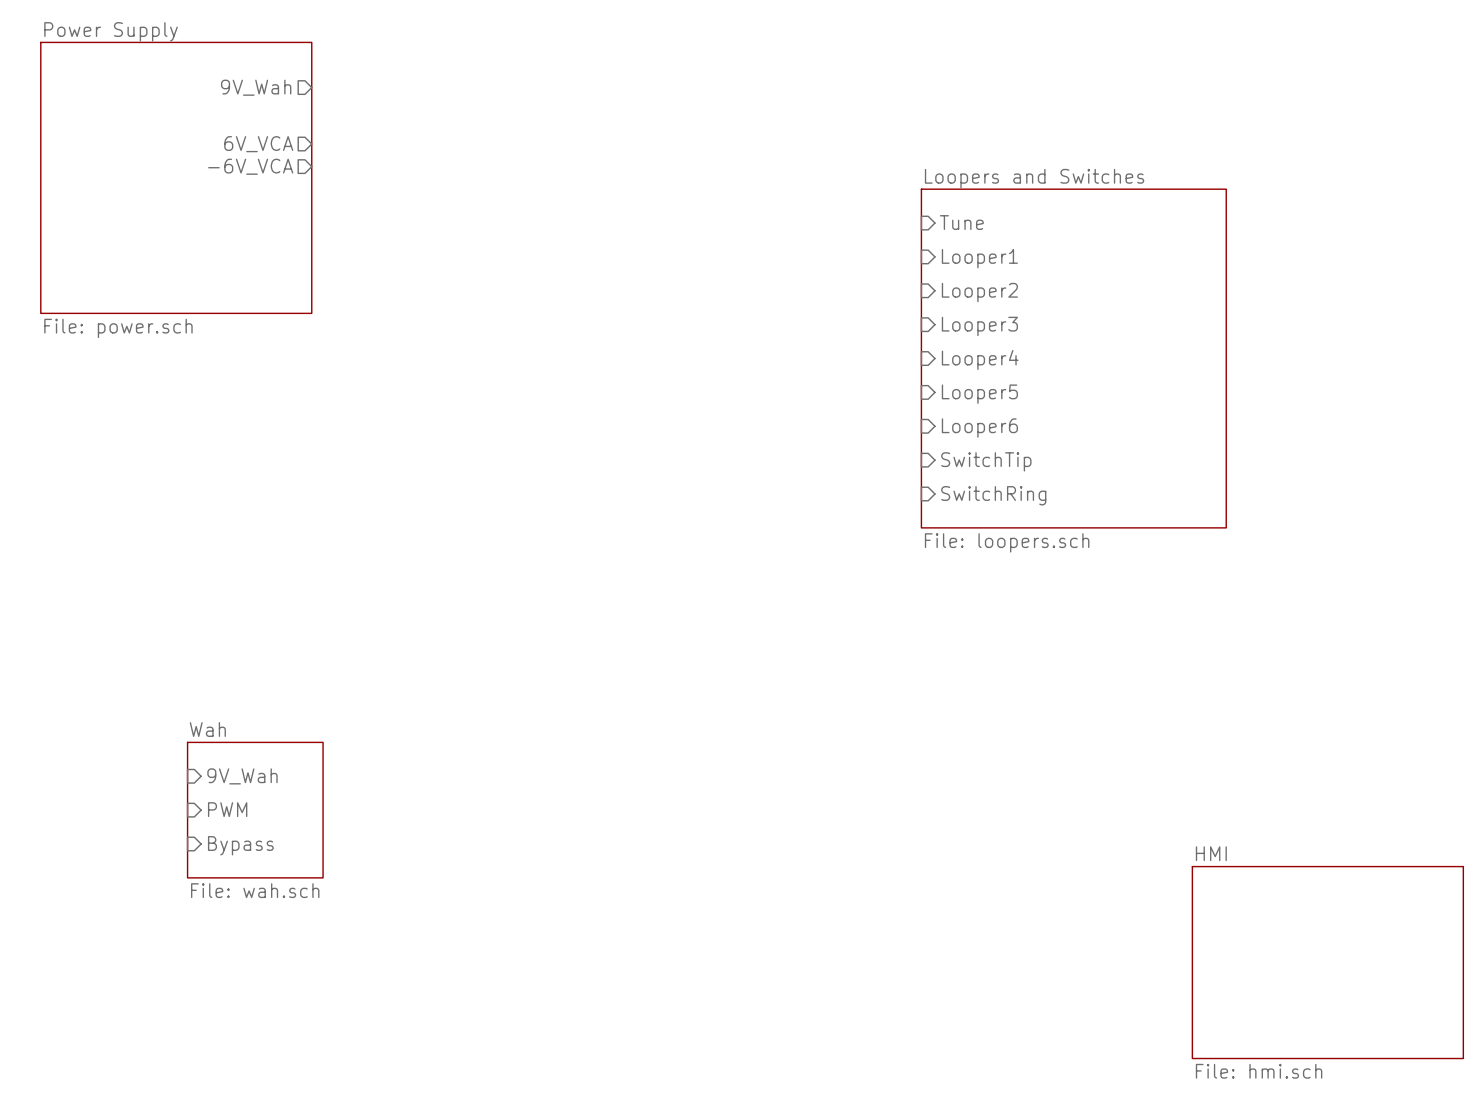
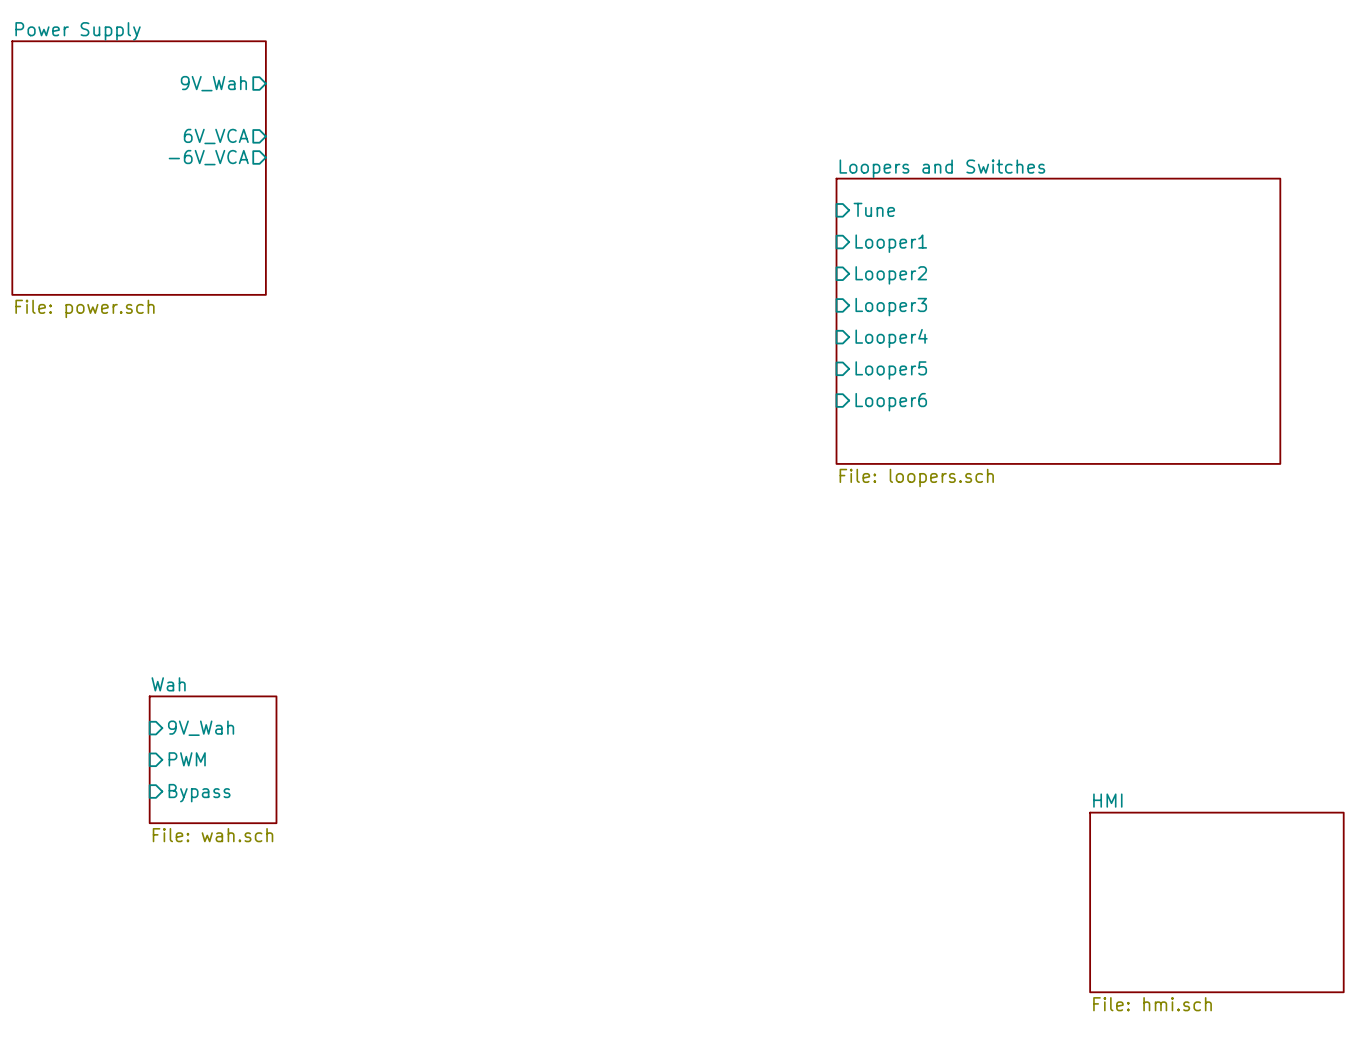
sheet Loopers and Switches: none -> File: loopers.sch (1058, 321)
sheet Loopers and Switches: File: loopers.sch (1073, 358) -> none
sheet pin: SwitchTip (986, 461) -> none
sheet pin: SwitchRing (993, 495) -> none

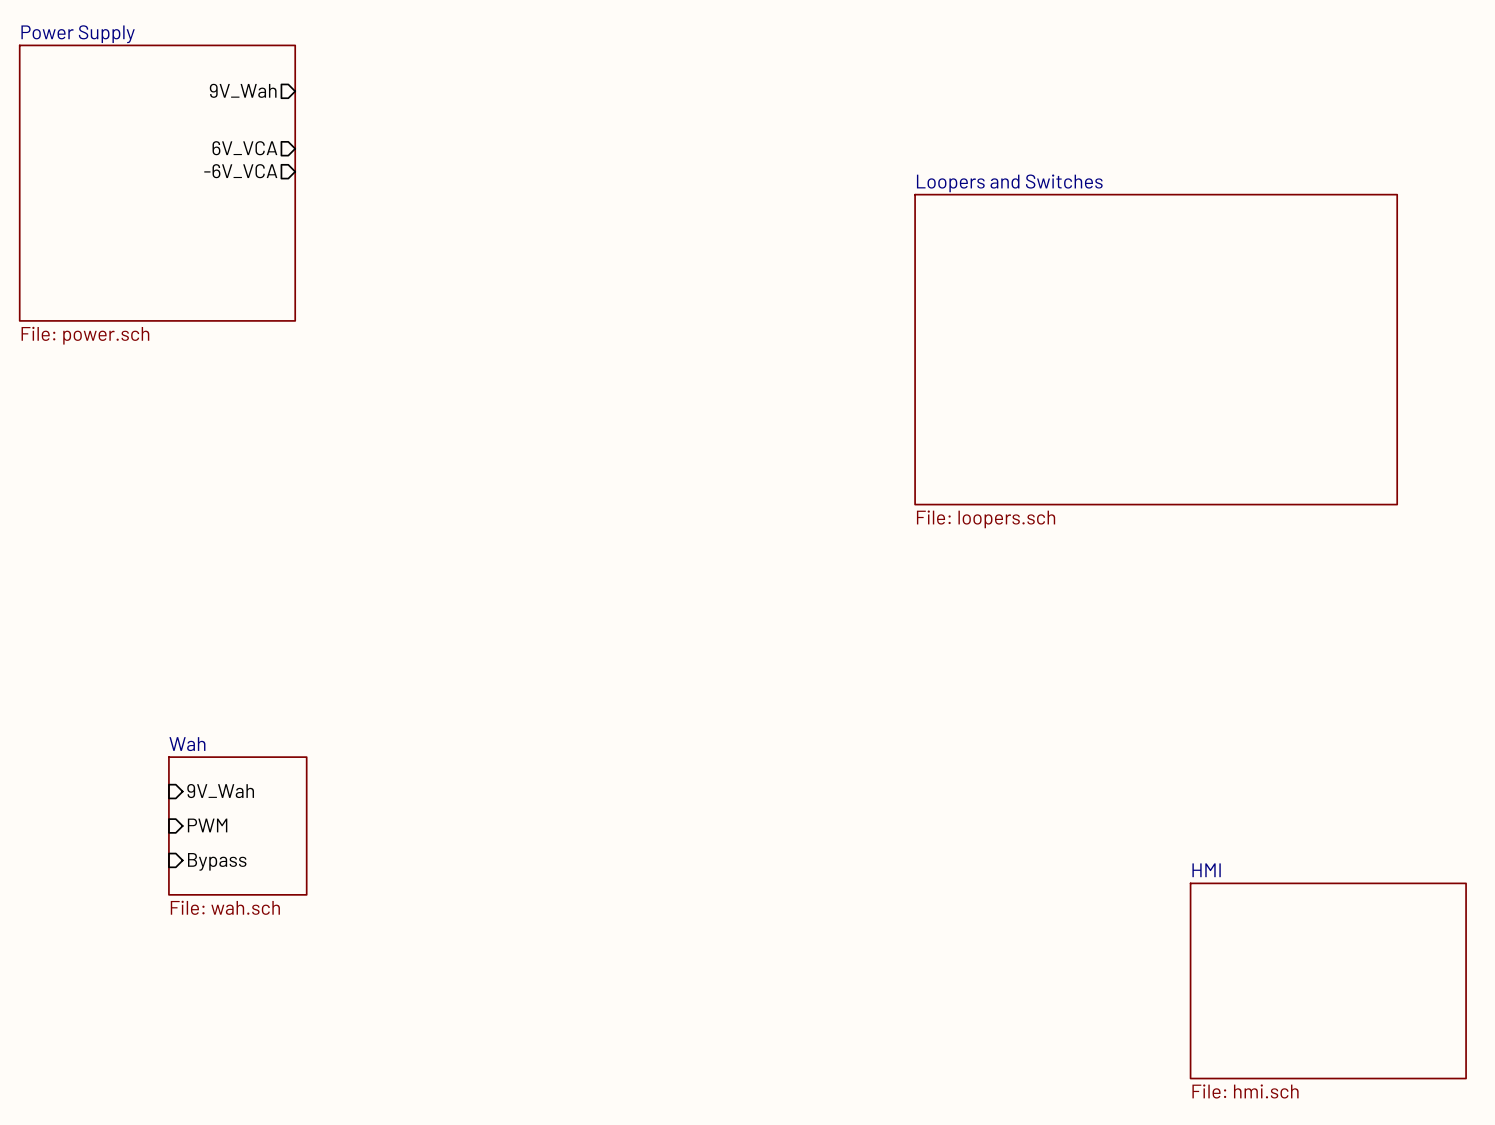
sheet pin: Tune (874, 209) -> none
sheet pin: Looper1 (891, 243) -> none
sheet pin: Looper2 (891, 275) -> none
sheet pin: Looper3 (891, 307) -> none
sheet pin: Looper4 (891, 338) -> none
sheet pin: Looper5 (891, 370) -> none
sheet pin: Looper6 (891, 402) -> none

